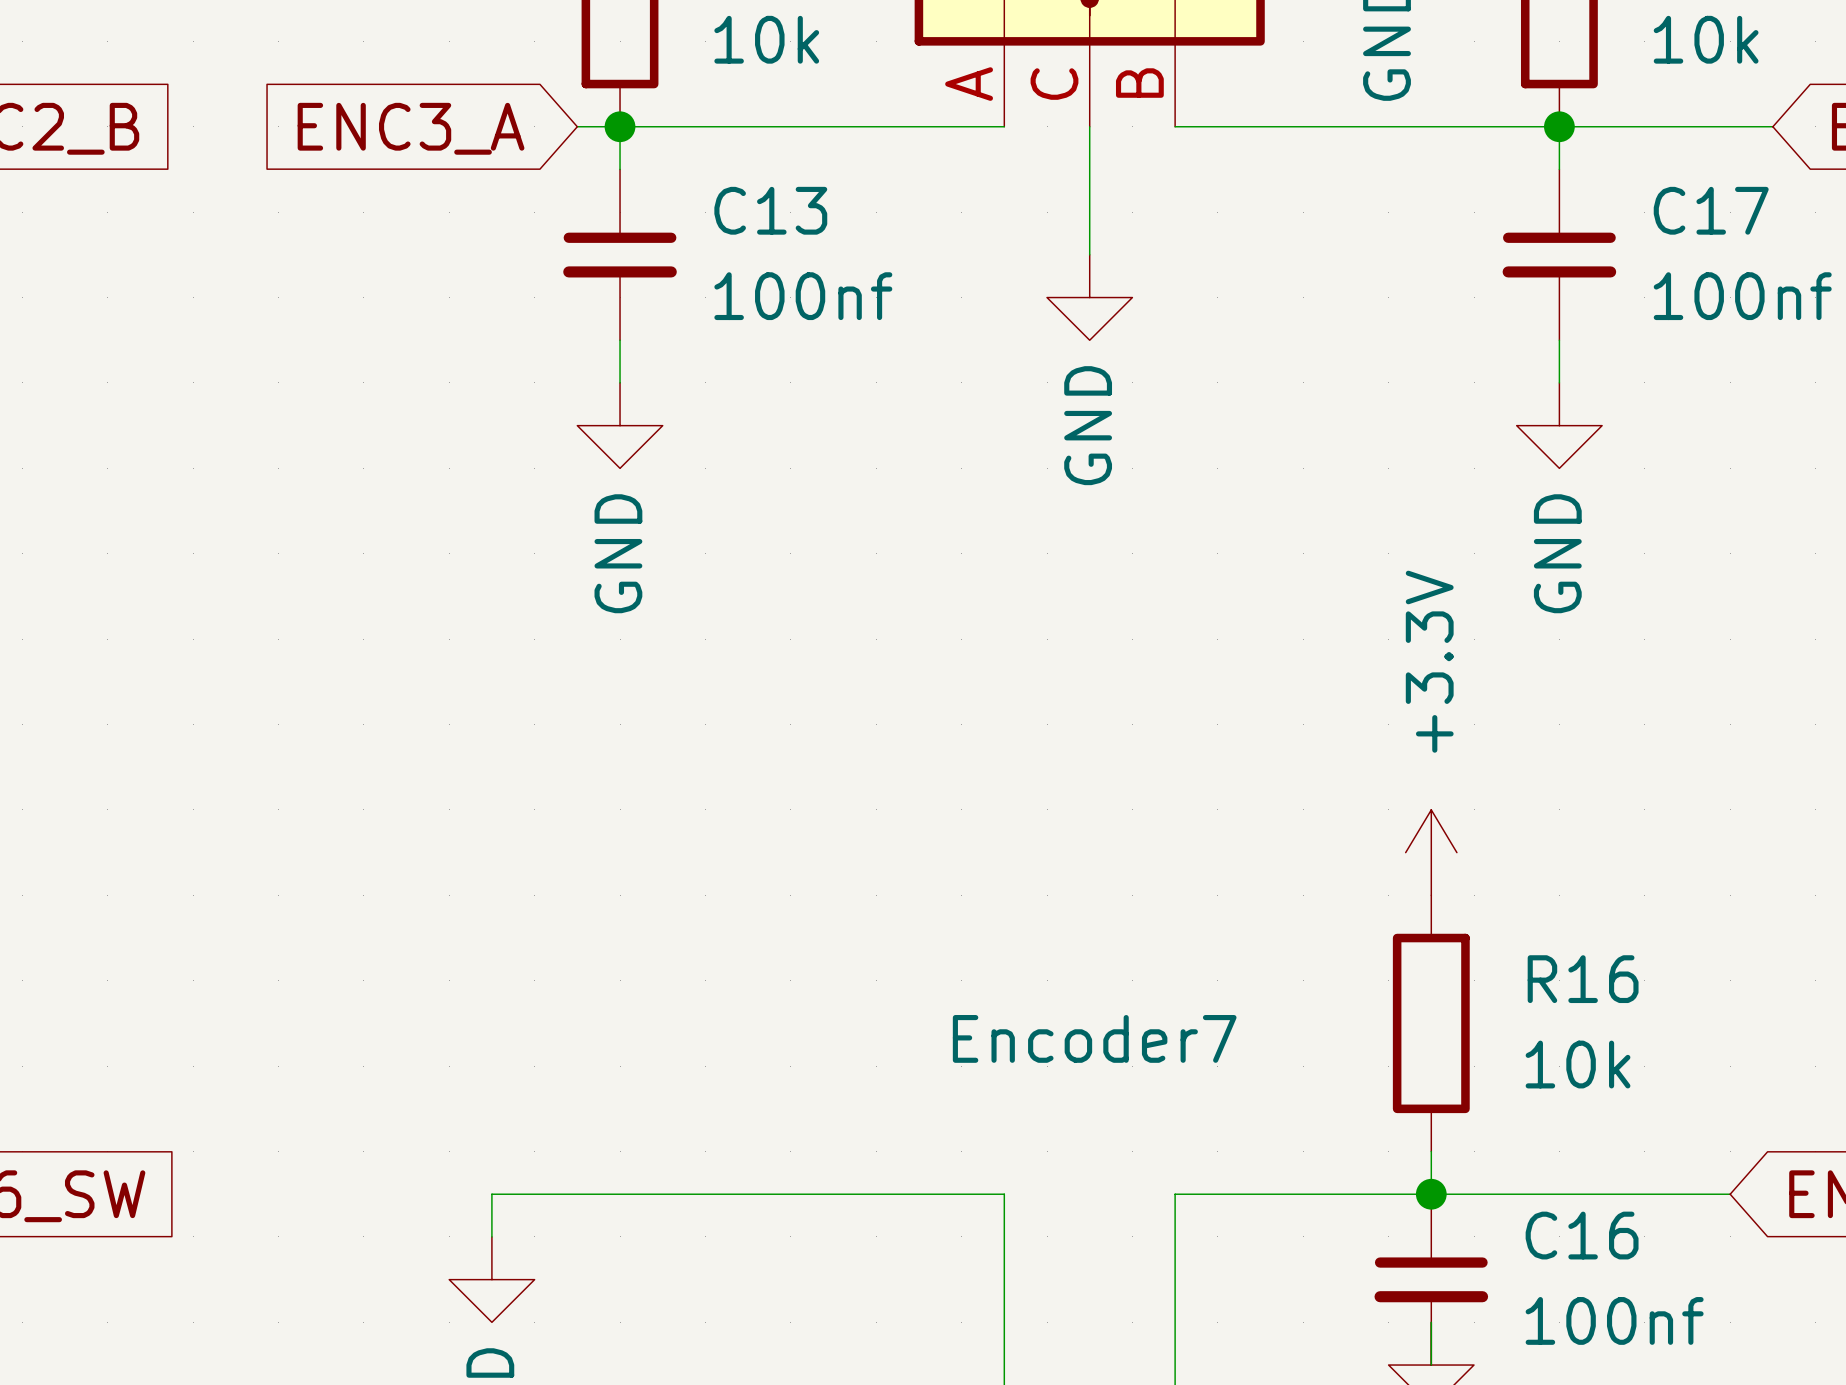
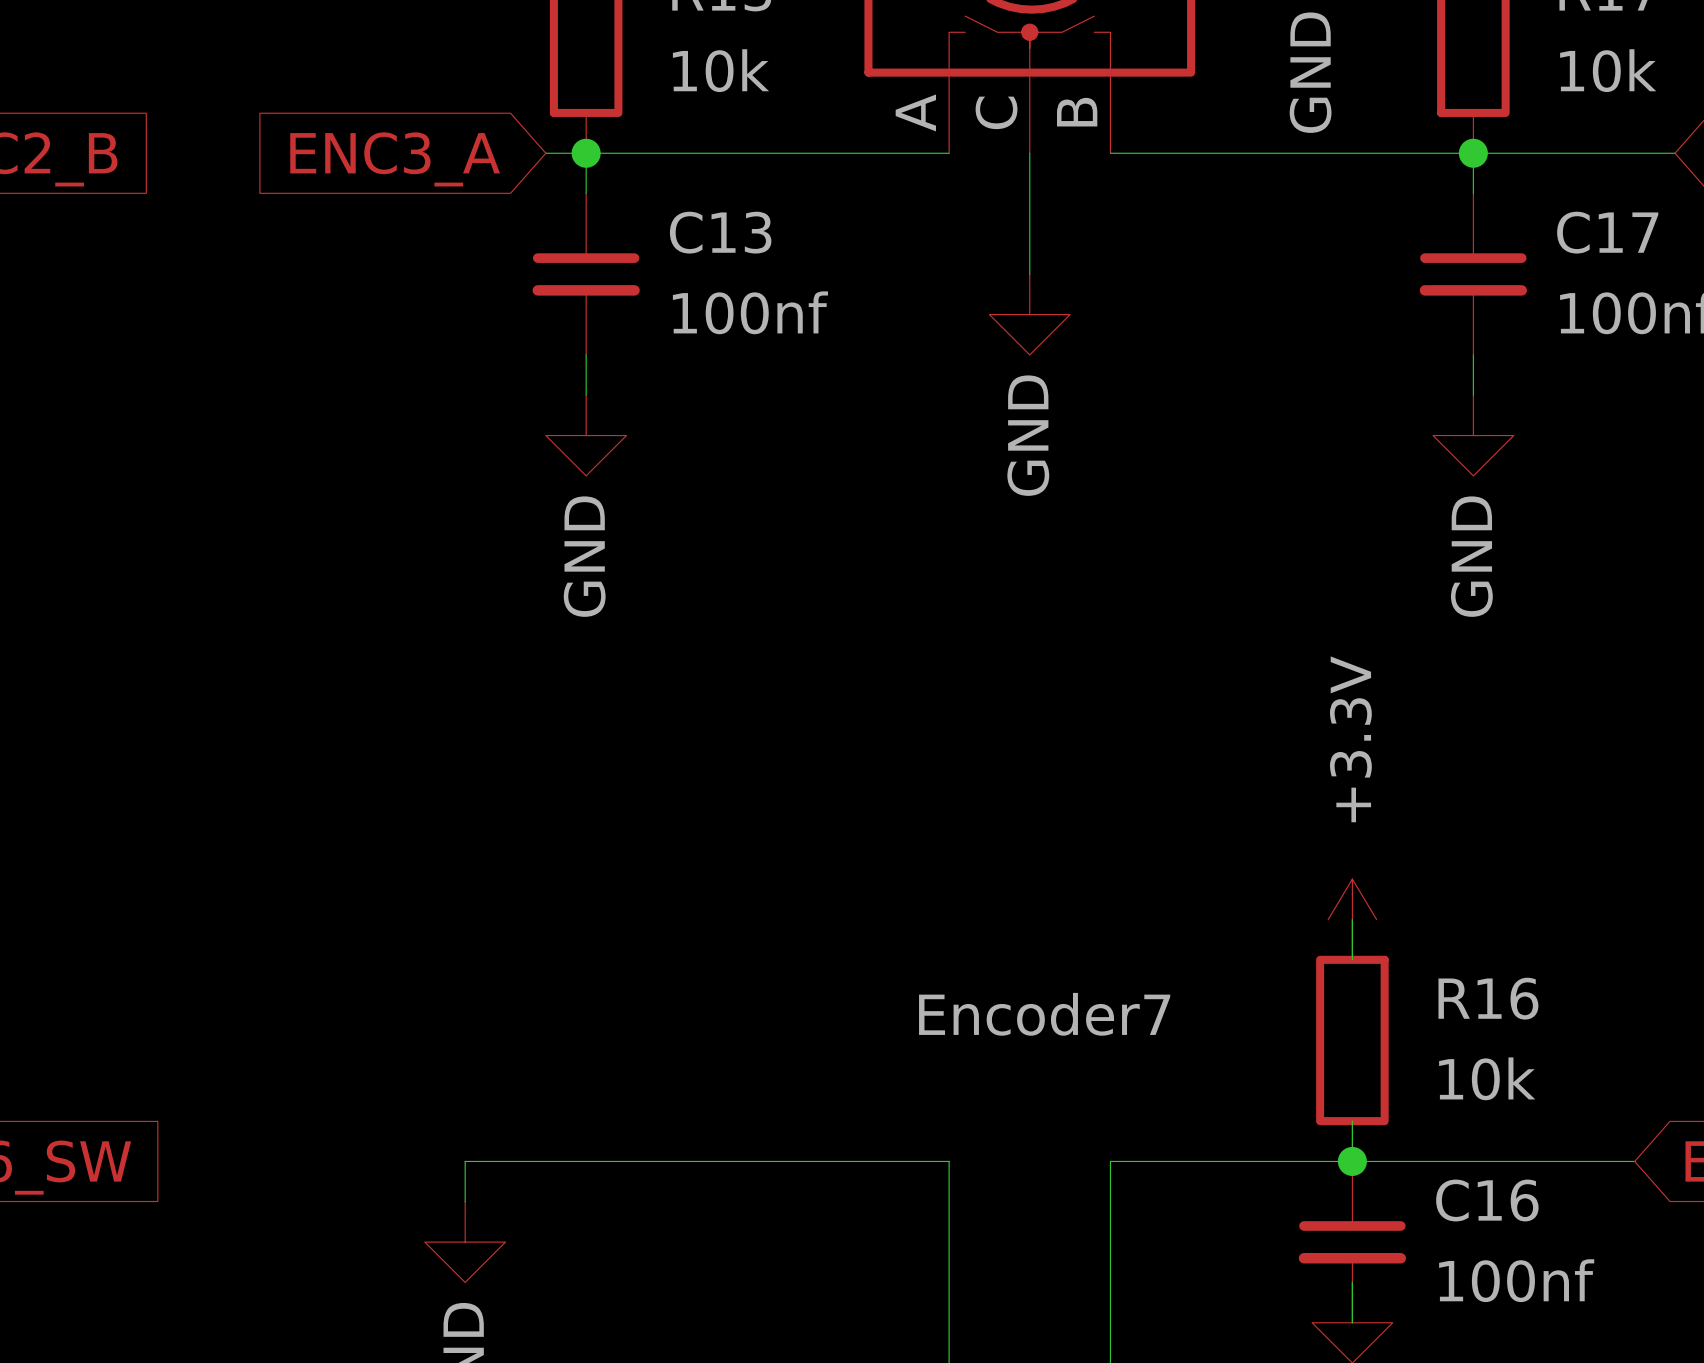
power symbol position: +3.3V (1431, 852) -> +3.3V (1352, 919)
wire: none -> (1352, 919) (1352, 959)
R16 position: (1431, 1023) -> (1352, 1040)

